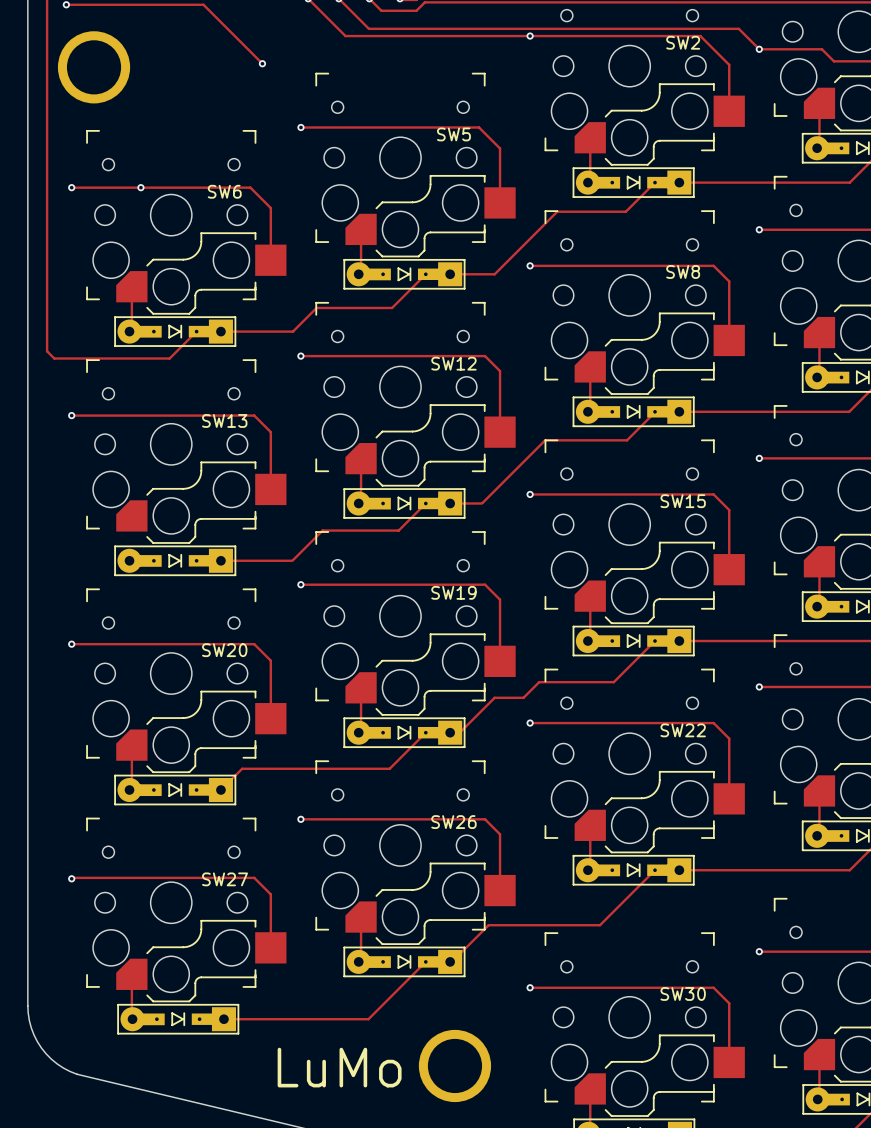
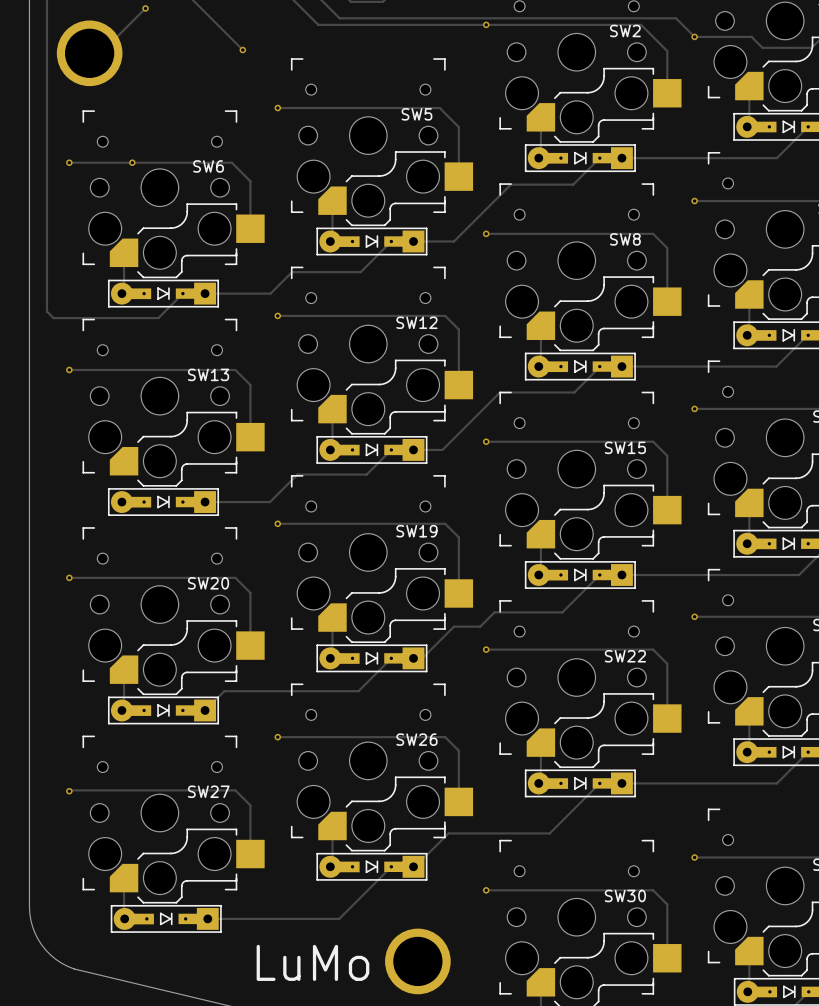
track: none -> (145, 8) (100, 53)
via: none -> (145, 8)

